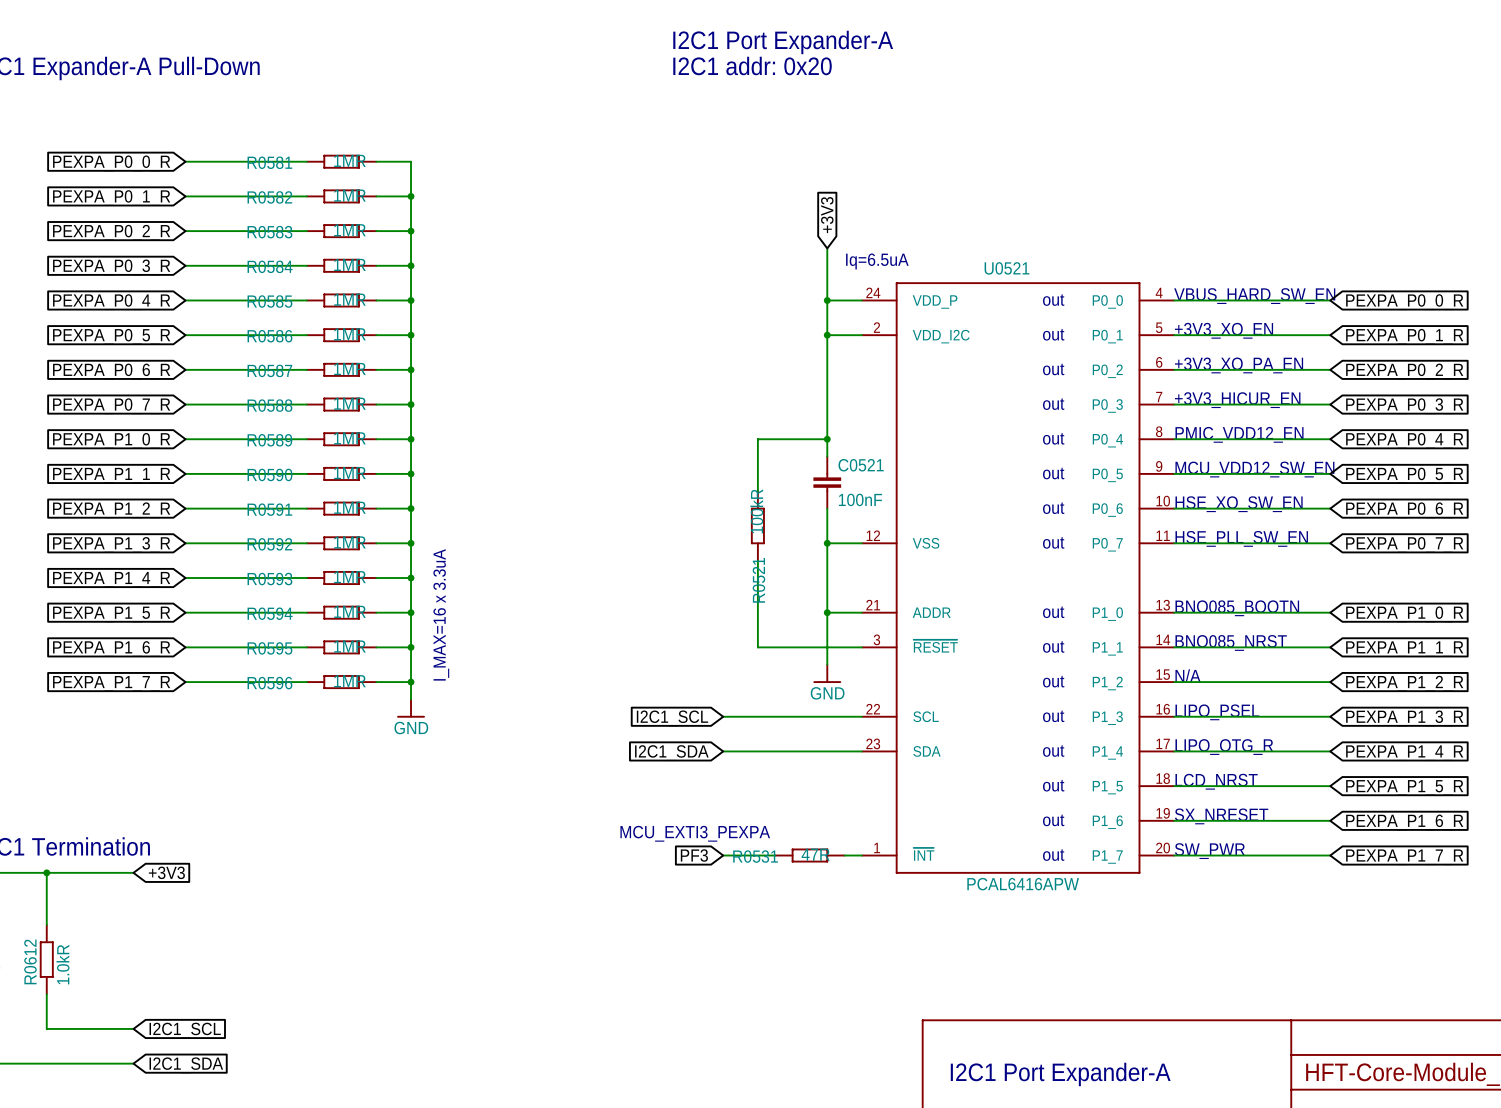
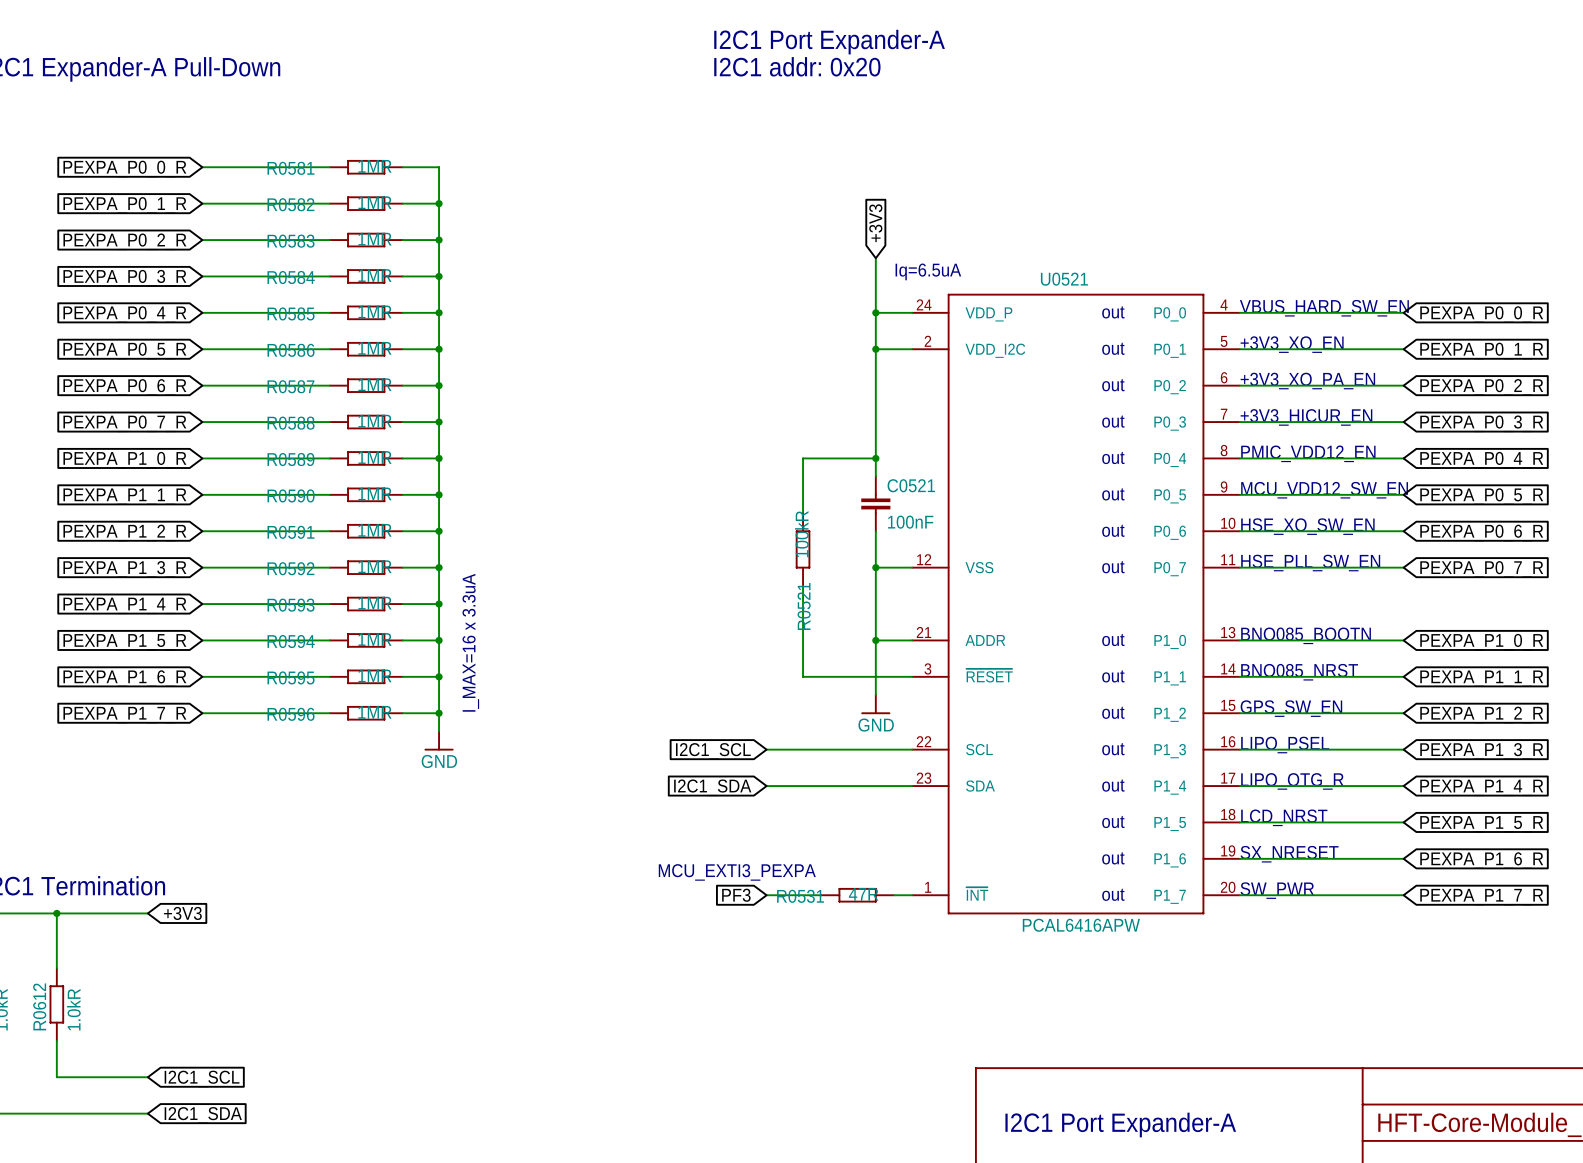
text: N/A (1188, 675) -> GPS_SW_EN (1291, 708)

